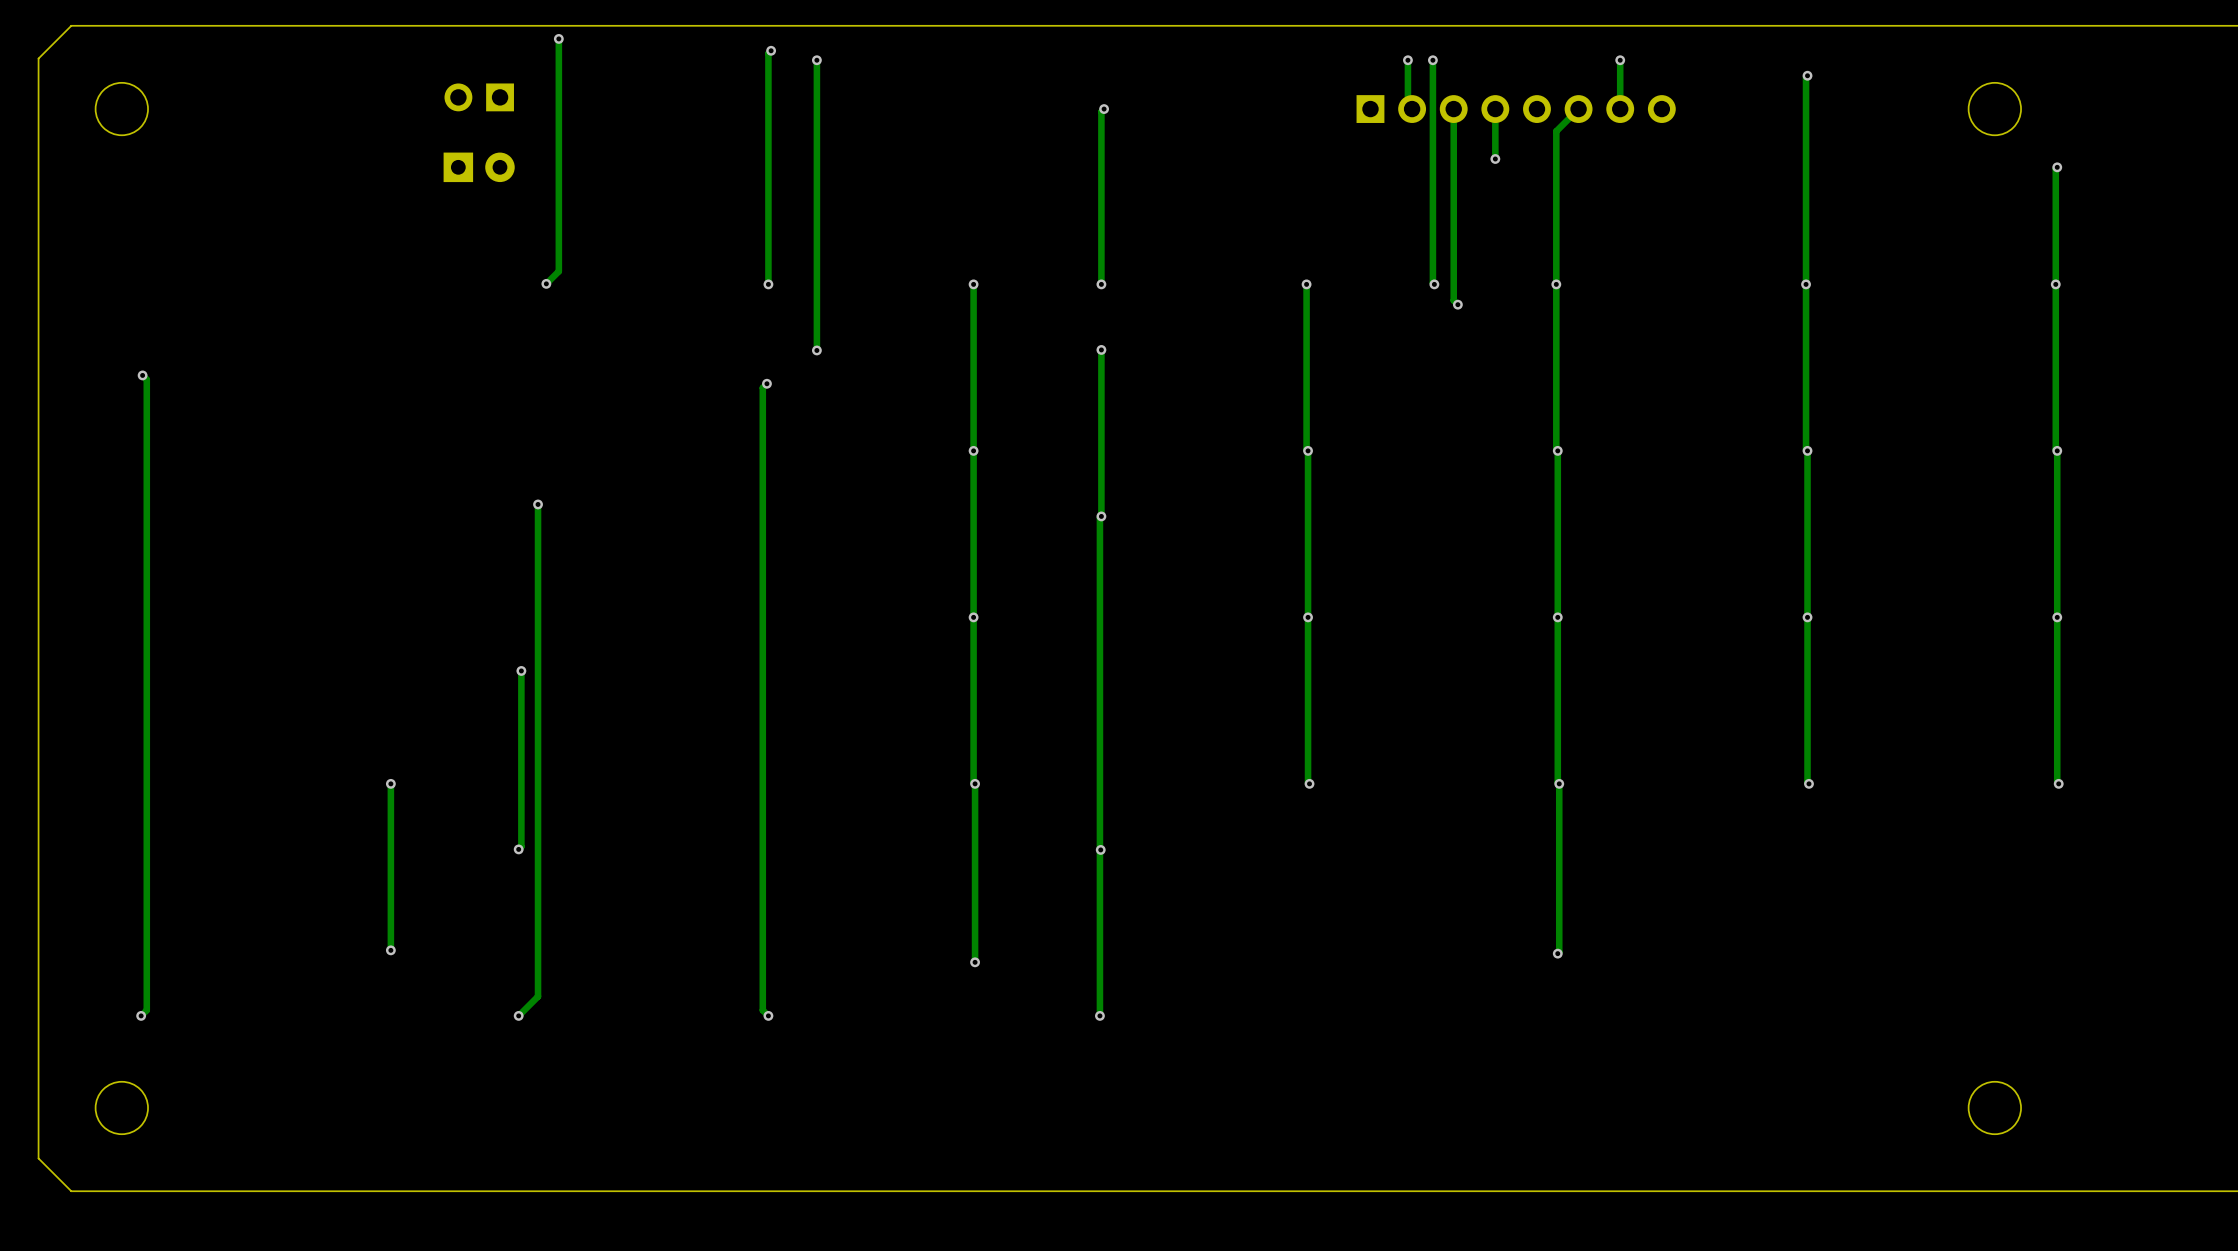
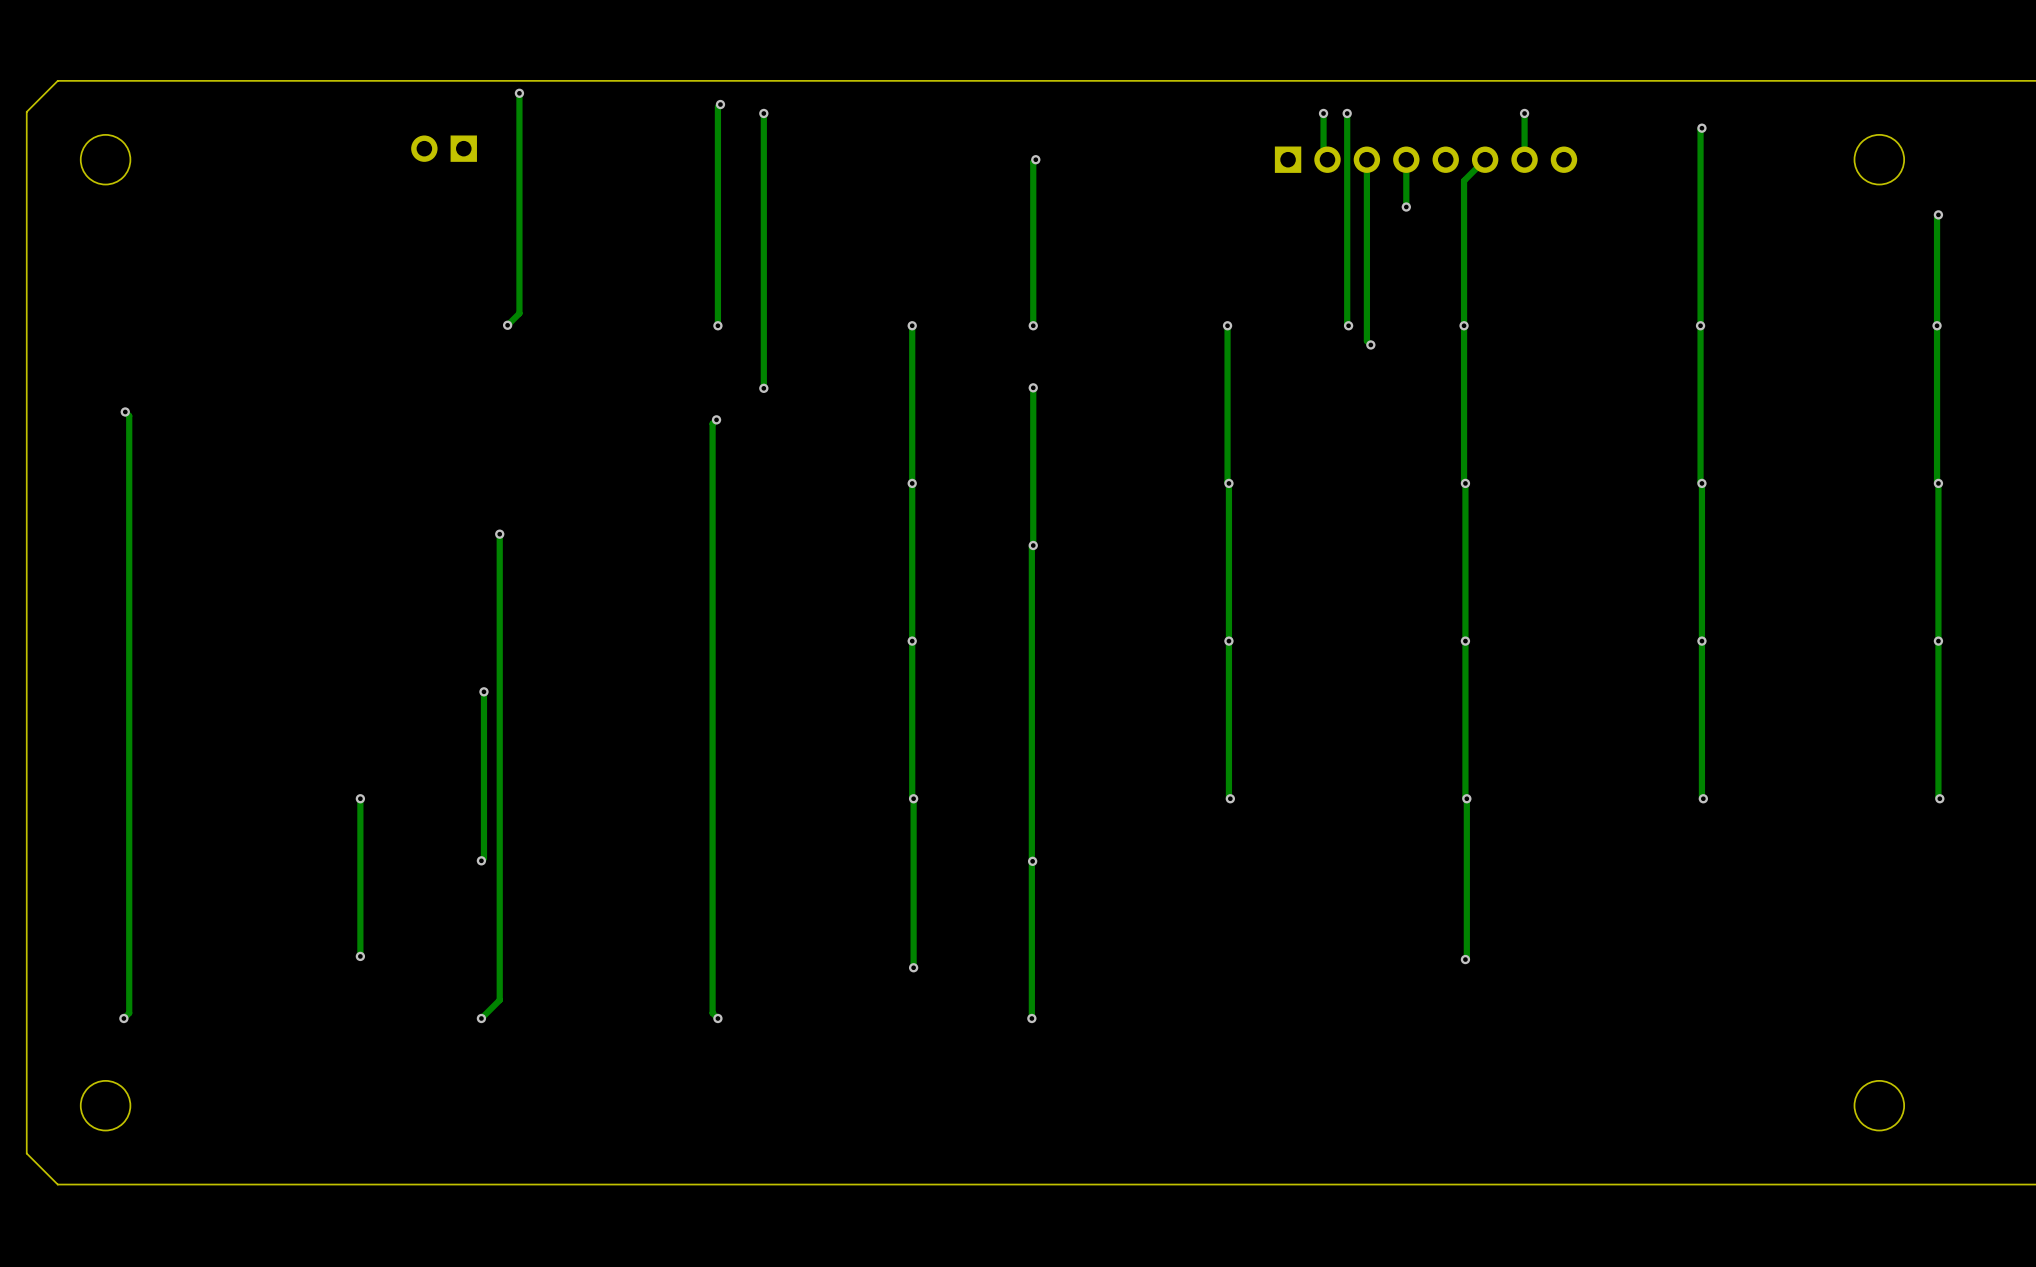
part: (479, 167) -> none

